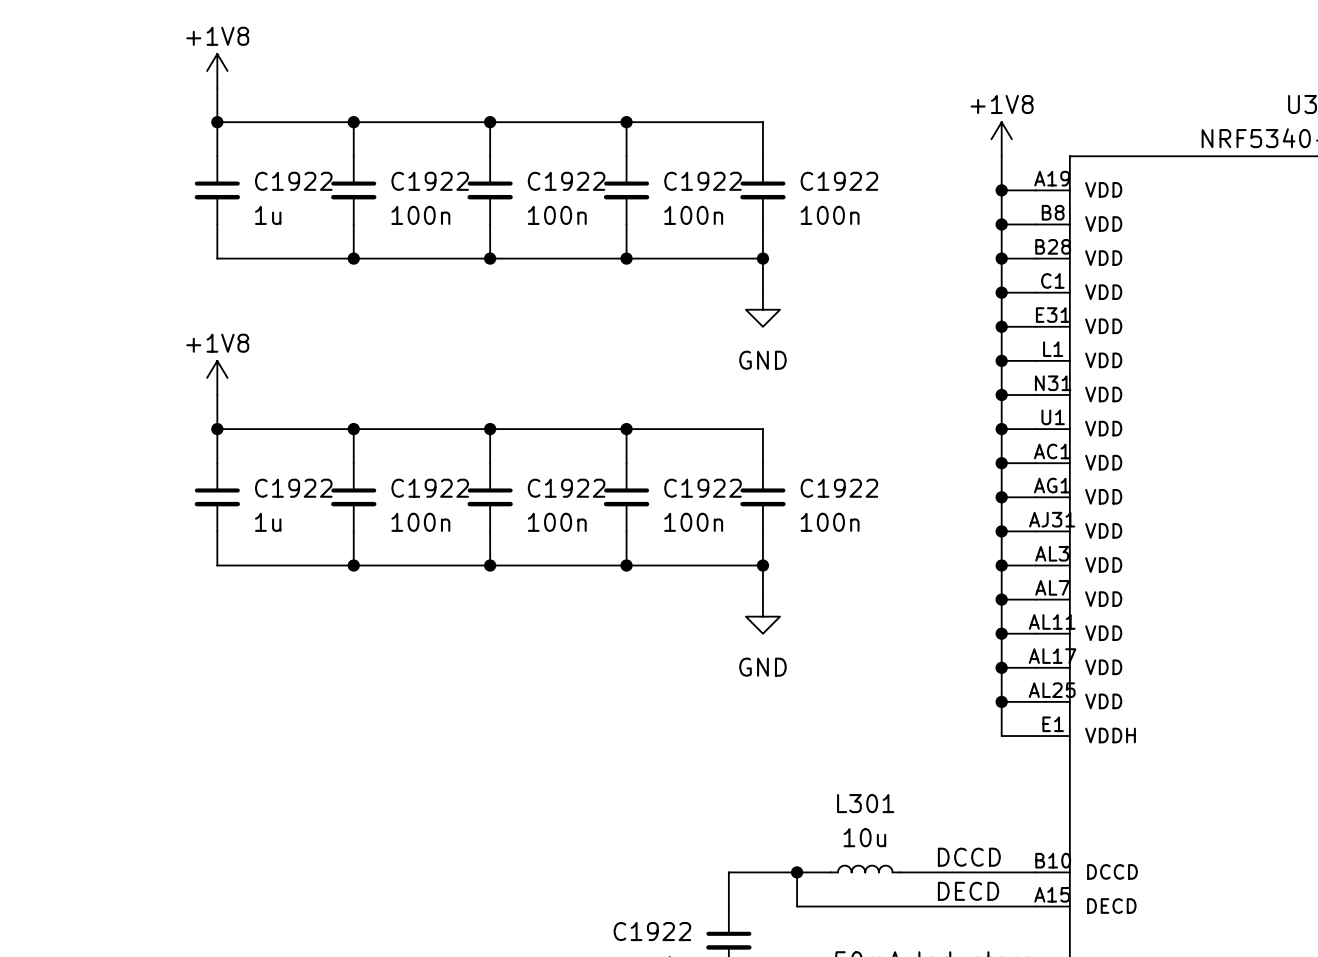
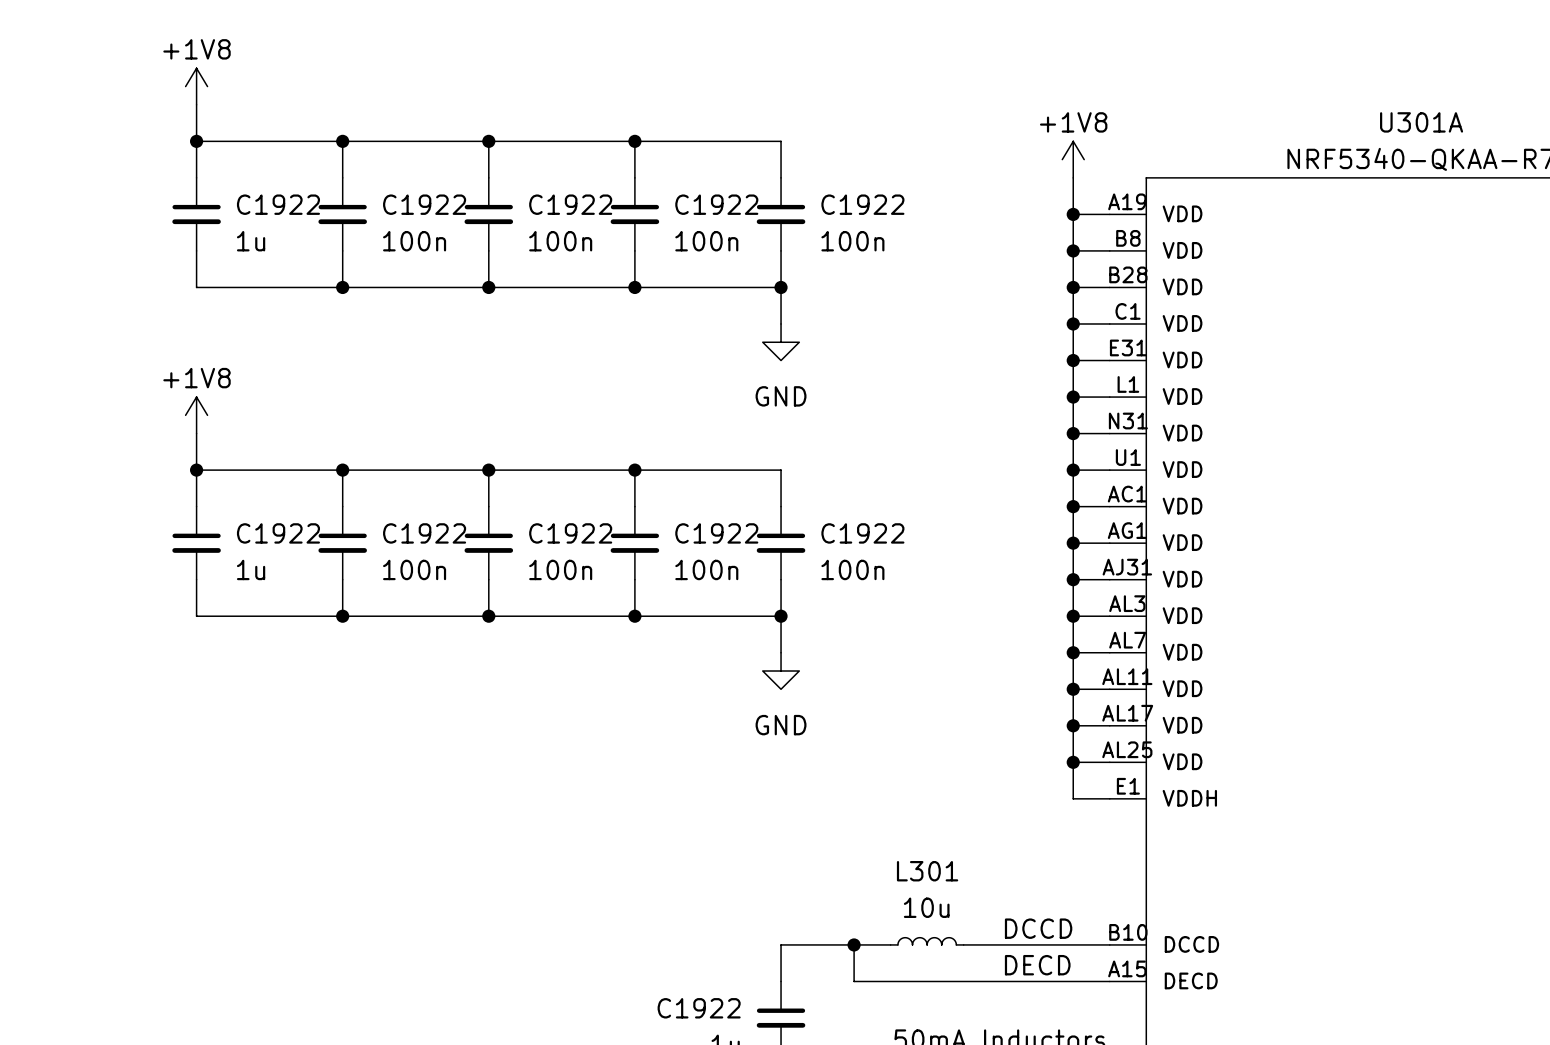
power symbol position: +1V8 (217, 71) -> +1V8 (196, 86)
wire: (217, 88) (217, 156) -> (196, 104) (196, 177)
wire: none -> (196, 141) (233, 141)
junction position: (217, 122) -> (196, 141)
wire: (353, 122) (353, 156) -> (342, 141) (342, 177)
junction position: (353, 122) -> (342, 141)
wire: (490, 122) (490, 156) -> (488, 141) (488, 177)
junction position: (490, 122) -> (488, 141)
wire: (626, 122) (626, 156) -> (634, 141) (634, 177)
junction position: (626, 122) -> (634, 141)
wire: (728, 122) (762, 122) (762, 156) -> (781, 141) (781, 177)
C1922 position: (217, 190) -> (196, 214)
C1922 position: (353, 190) -> (342, 214)
C1922 position: (490, 190) -> (488, 214)
C1922 position: (626, 190) -> (634, 214)
C1922 position: (762, 190) -> (781, 214)
wire: (217, 224) (217, 258) -> (196, 250) (196, 287) (233, 287)
wire: (353, 224) (353, 258) -> (342, 250) (342, 287)
wire: (490, 224) (490, 258) -> (488, 250) (488, 287)
wire: (626, 224) (626, 258) -> (634, 250) (634, 287)
wire: (762, 224) (762, 292) -> (781, 250) (781, 323)
junction position: (353, 258) -> (342, 287)
junction position: (490, 258) -> (488, 287)
junction position: (626, 258) -> (634, 287)
wire: (728, 258) (762, 258) -> none
junction position: (762, 258) -> (781, 287)
power symbol position: GND (762, 309) -> GND (781, 342)
power symbol position: +1V8 (217, 377) -> +1V8 (196, 415)
wire: (217, 394) (217, 463) -> (196, 433) (196, 506)
wire: none -> (196, 470) (233, 470)
junction position: (217, 429) -> (196, 470)
wire: (353, 429) (353, 463) -> (342, 470) (342, 506)
junction position: (353, 429) -> (342, 470)
wire: (490, 429) (490, 463) -> (488, 470) (488, 506)
junction position: (490, 429) -> (488, 470)
wire: (626, 429) (626, 463) -> (634, 470) (634, 506)
junction position: (626, 429) -> (634, 470)
wire: (728, 429) (762, 429) (762, 463) -> (781, 470) (781, 506)
C1922 position: (217, 497) -> (196, 543)
C1922 position: (353, 497) -> (342, 543)
C1922 position: (490, 497) -> (488, 543)
C1922 position: (626, 497) -> (634, 543)
C1922 position: (762, 497) -> (781, 543)
wire: (217, 531) (217, 565) -> (196, 579) (196, 616) (233, 616)
wire: (353, 531) (353, 565) -> (342, 579) (342, 616)
wire: (490, 531) (490, 565) -> (488, 579) (488, 616)
wire: (626, 531) (626, 565) -> (634, 579) (634, 616)
wire: (762, 531) (762, 599) -> (781, 579) (781, 652)
junction position: (353, 565) -> (342, 616)
junction position: (490, 565) -> (488, 616)
junction position: (626, 565) -> (634, 616)
wire: (728, 565) (762, 565) -> none
junction position: (762, 565) -> (781, 616)
power symbol position: GND (762, 616) -> GND (781, 671)

